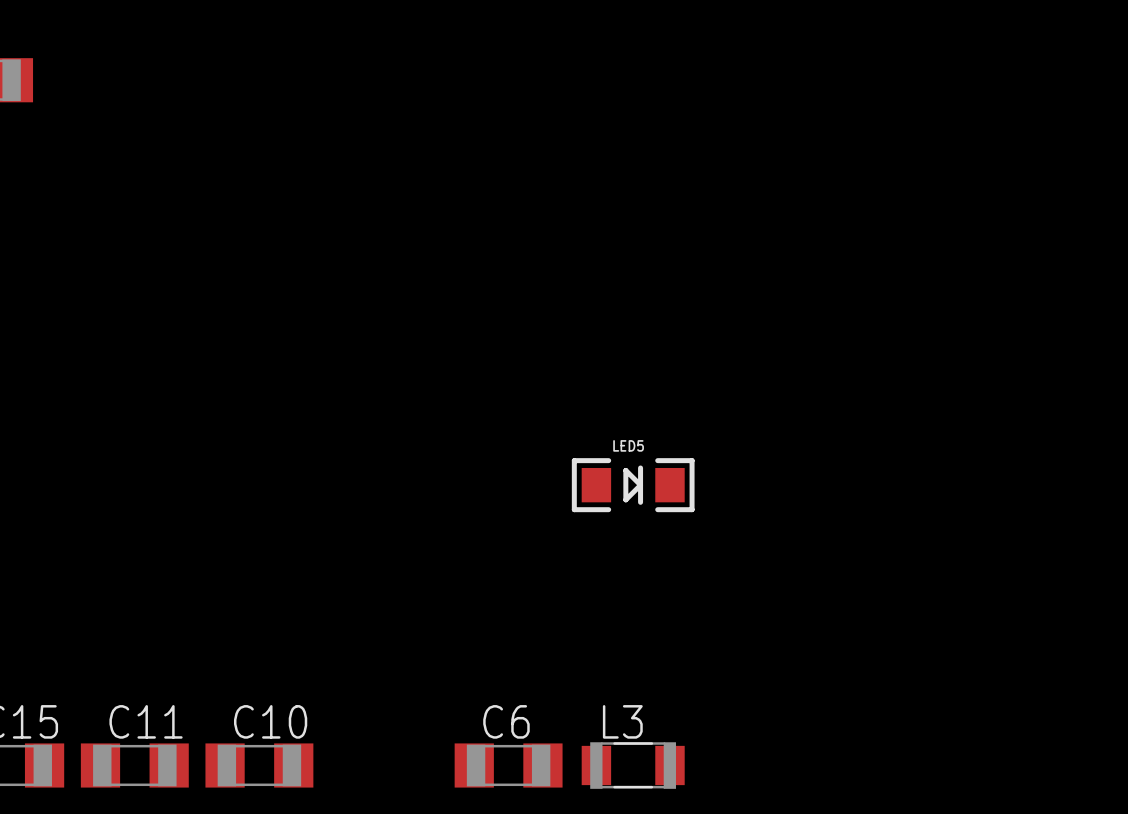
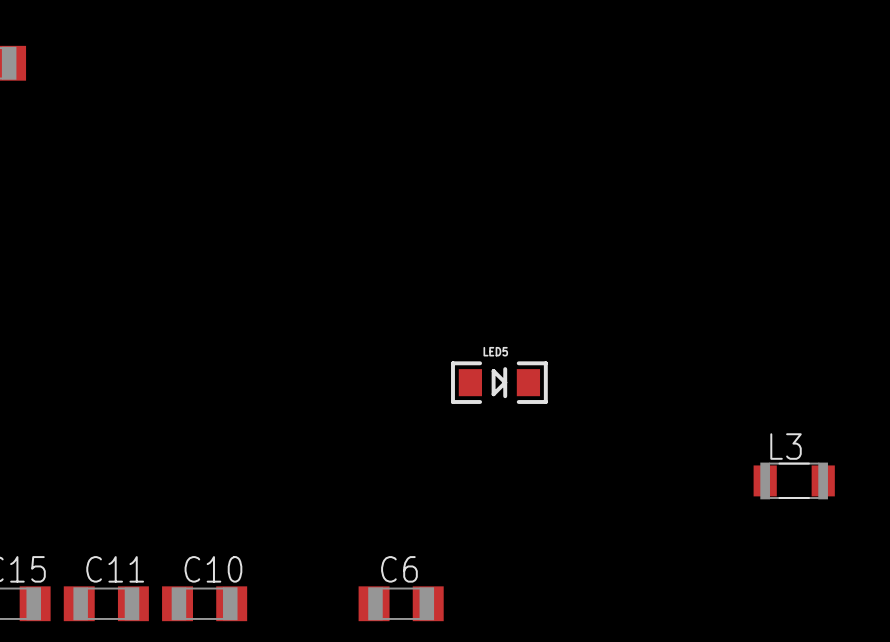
L3 position: (633, 765) -> (794, 480)

